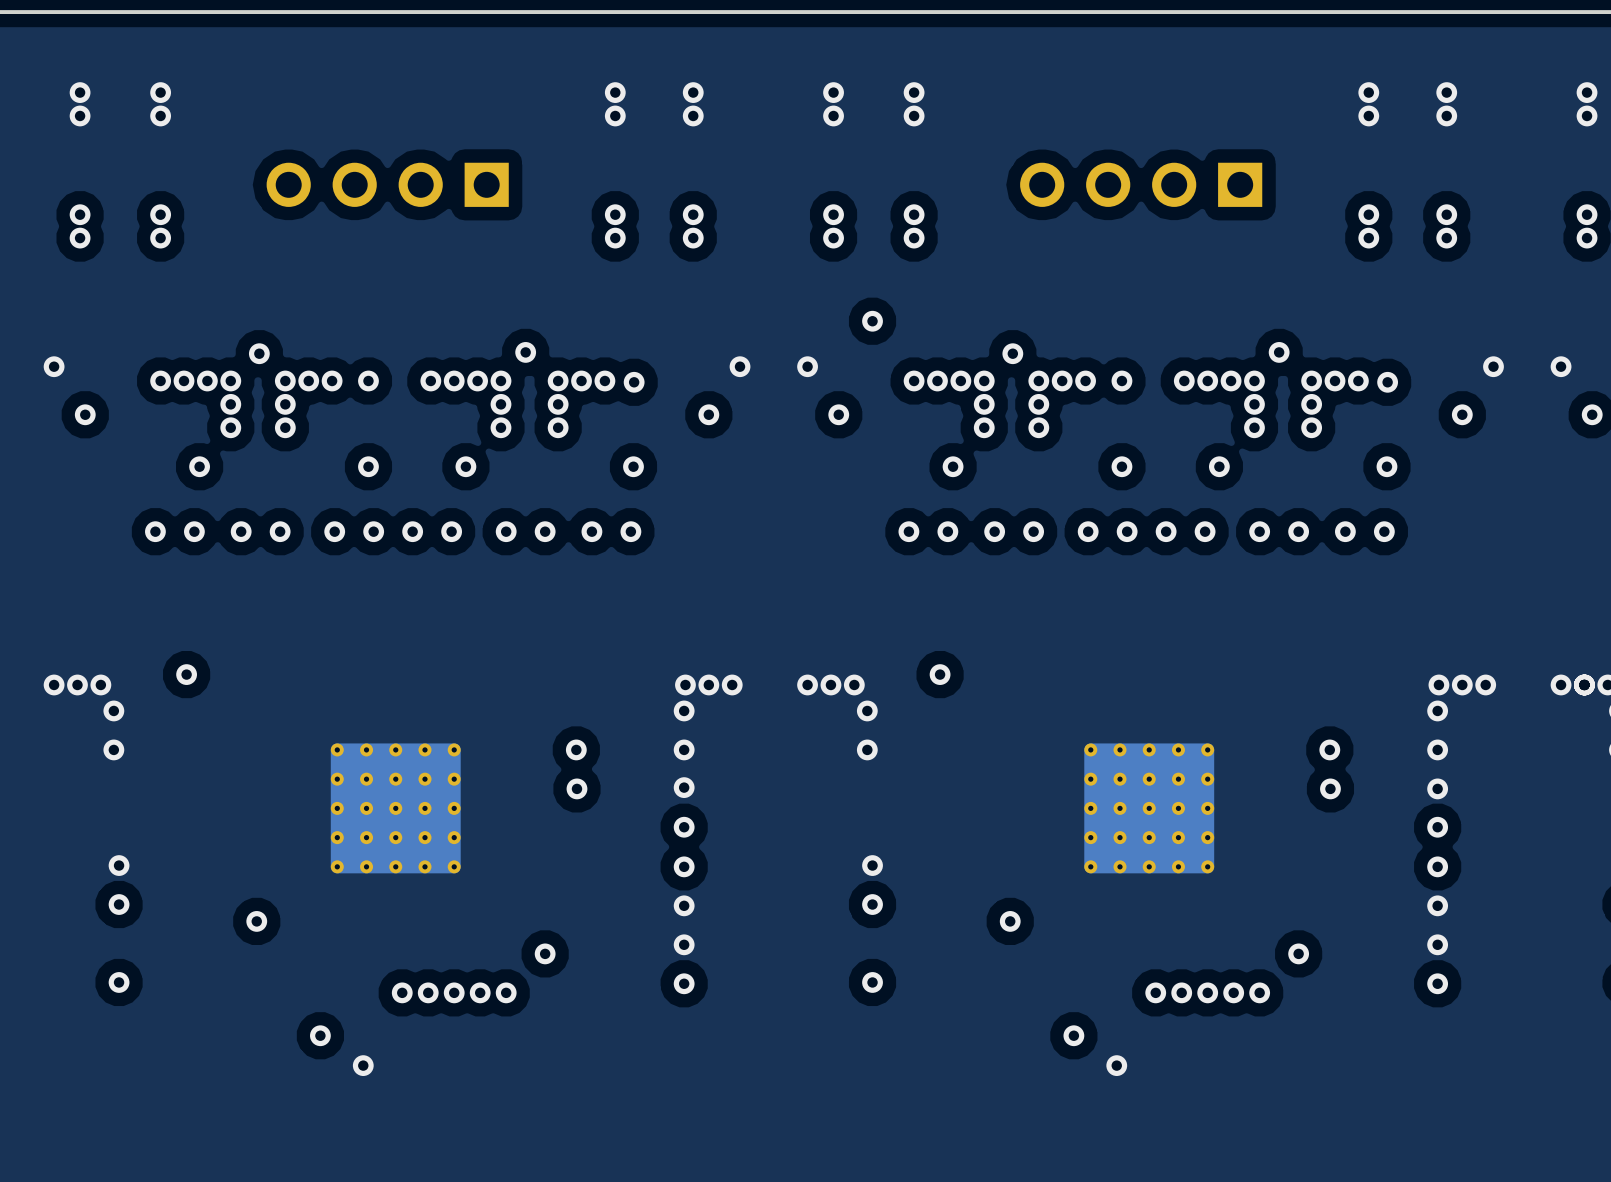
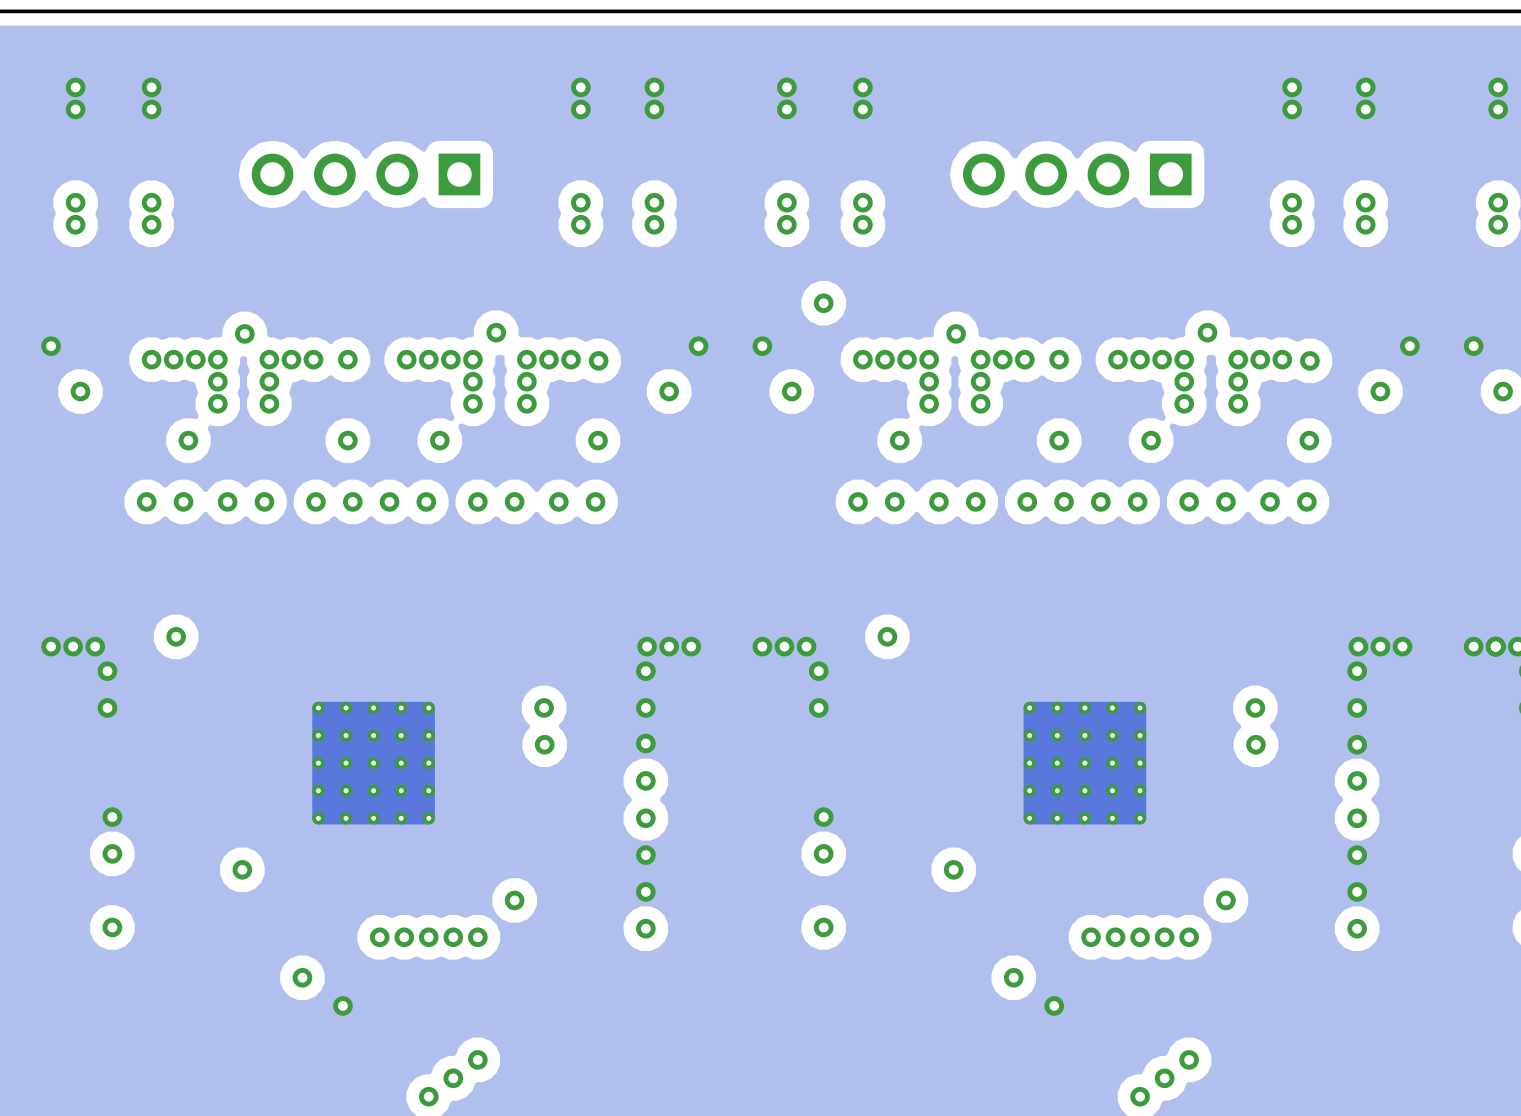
via: none -> (477, 1059)
via: none -> (1189, 1059)
via: none -> (453, 1078)
via: none -> (1164, 1078)
via: none -> (428, 1096)
via: none -> (1140, 1096)

